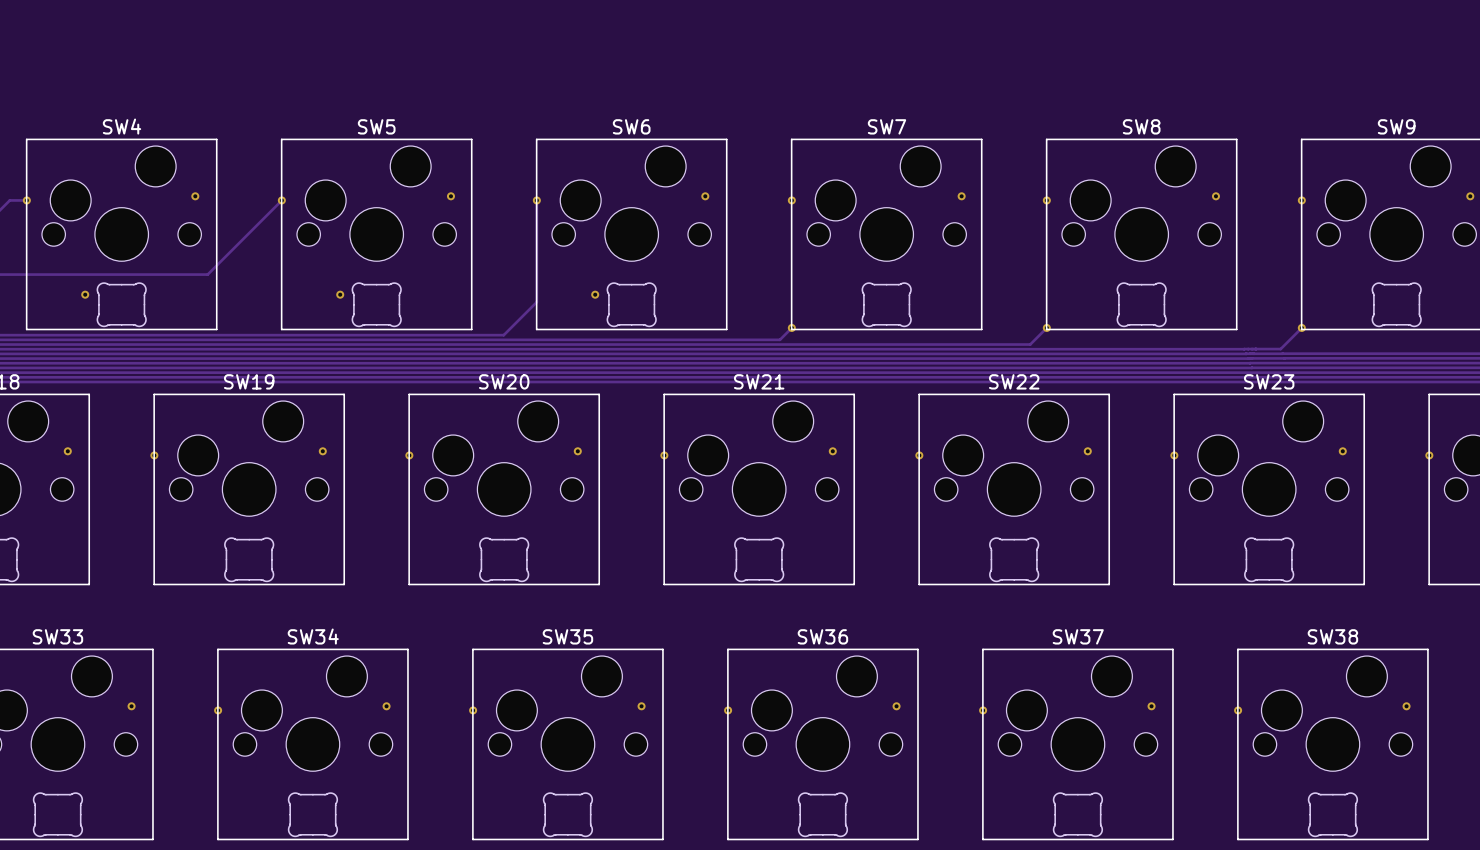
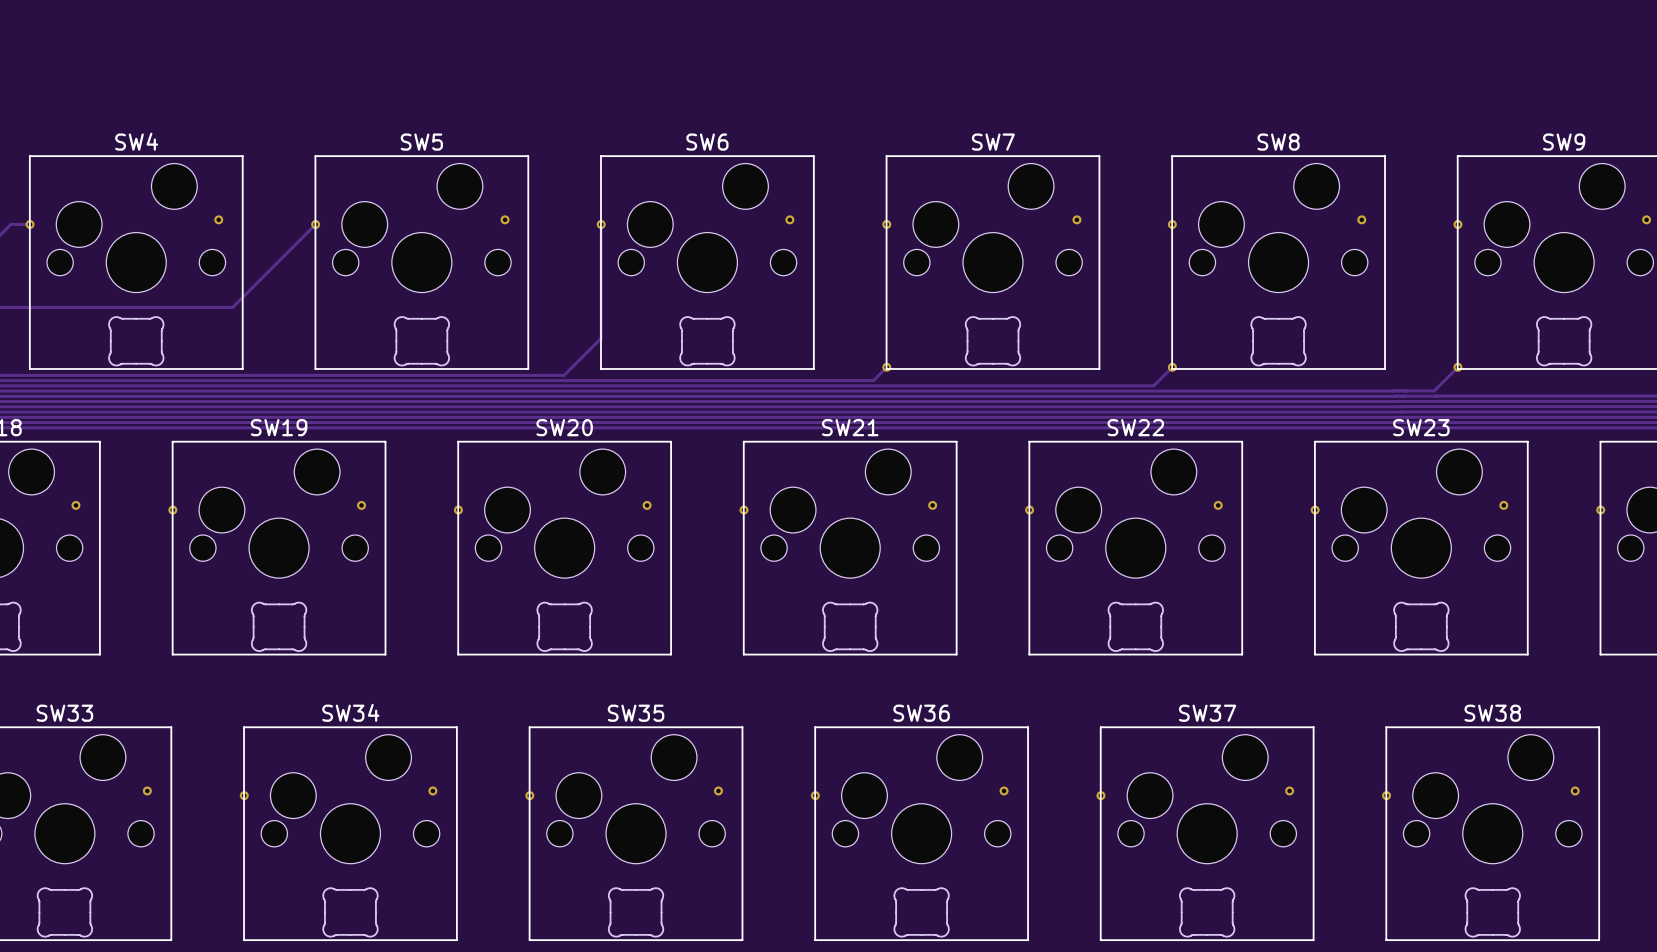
via: (85, 294) -> none
via: (340, 294) -> none
via: (595, 294) -> none

